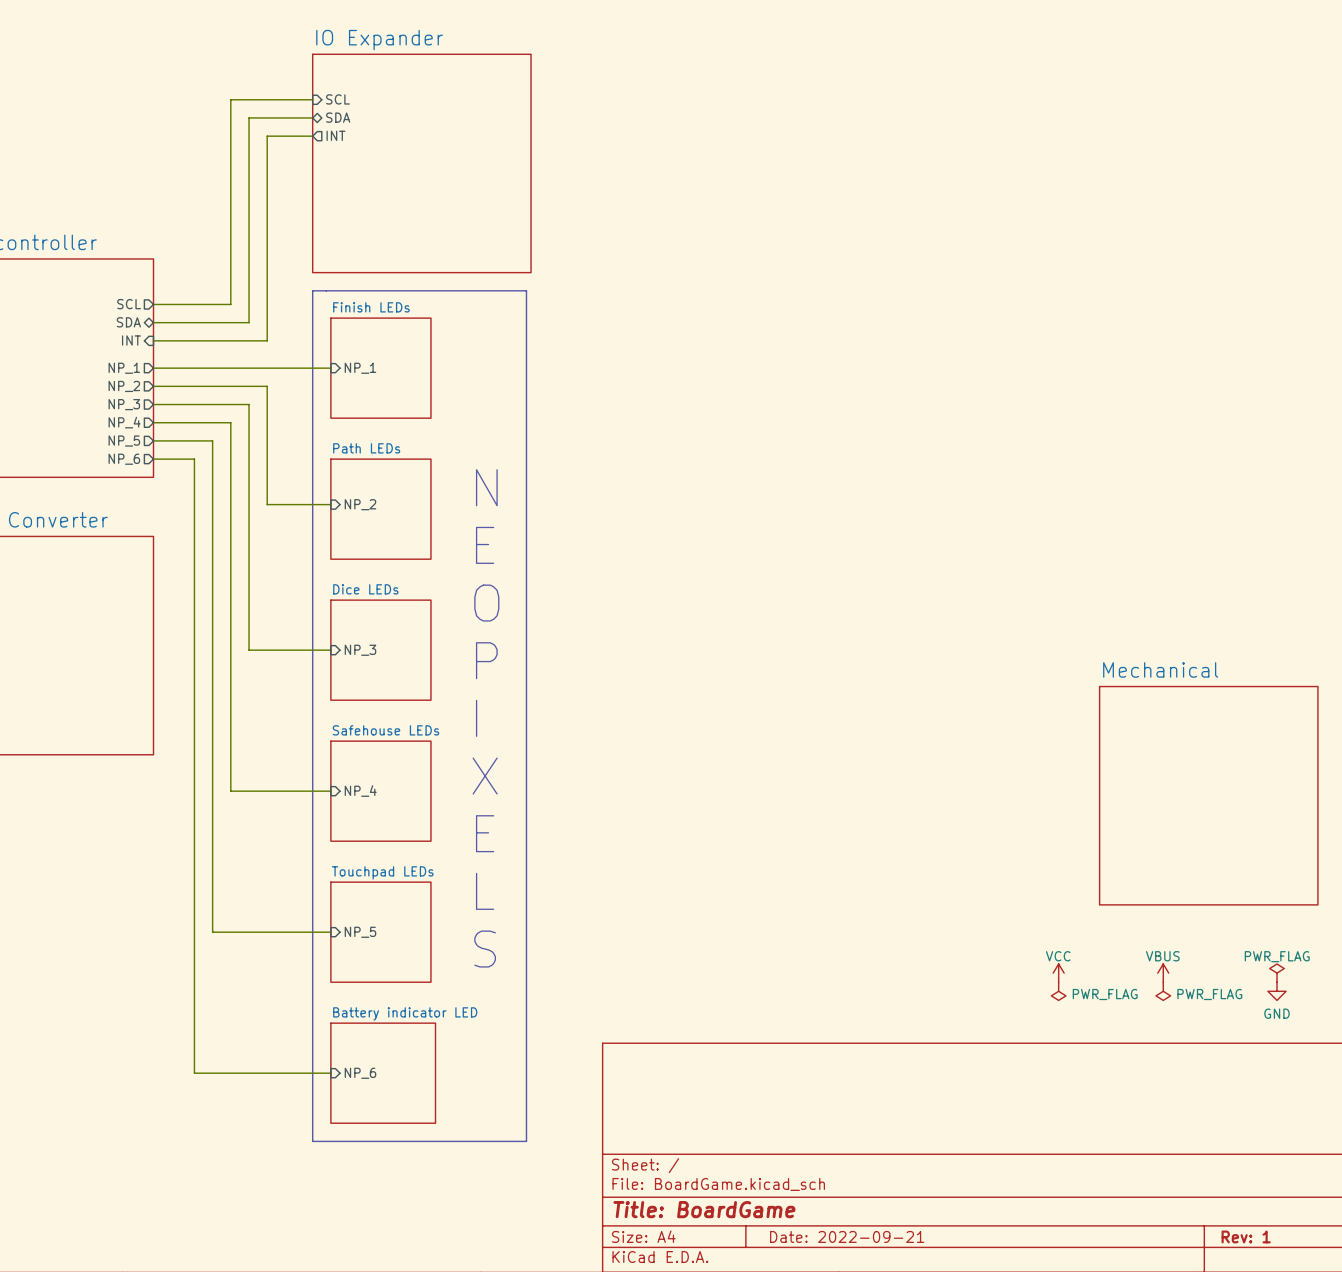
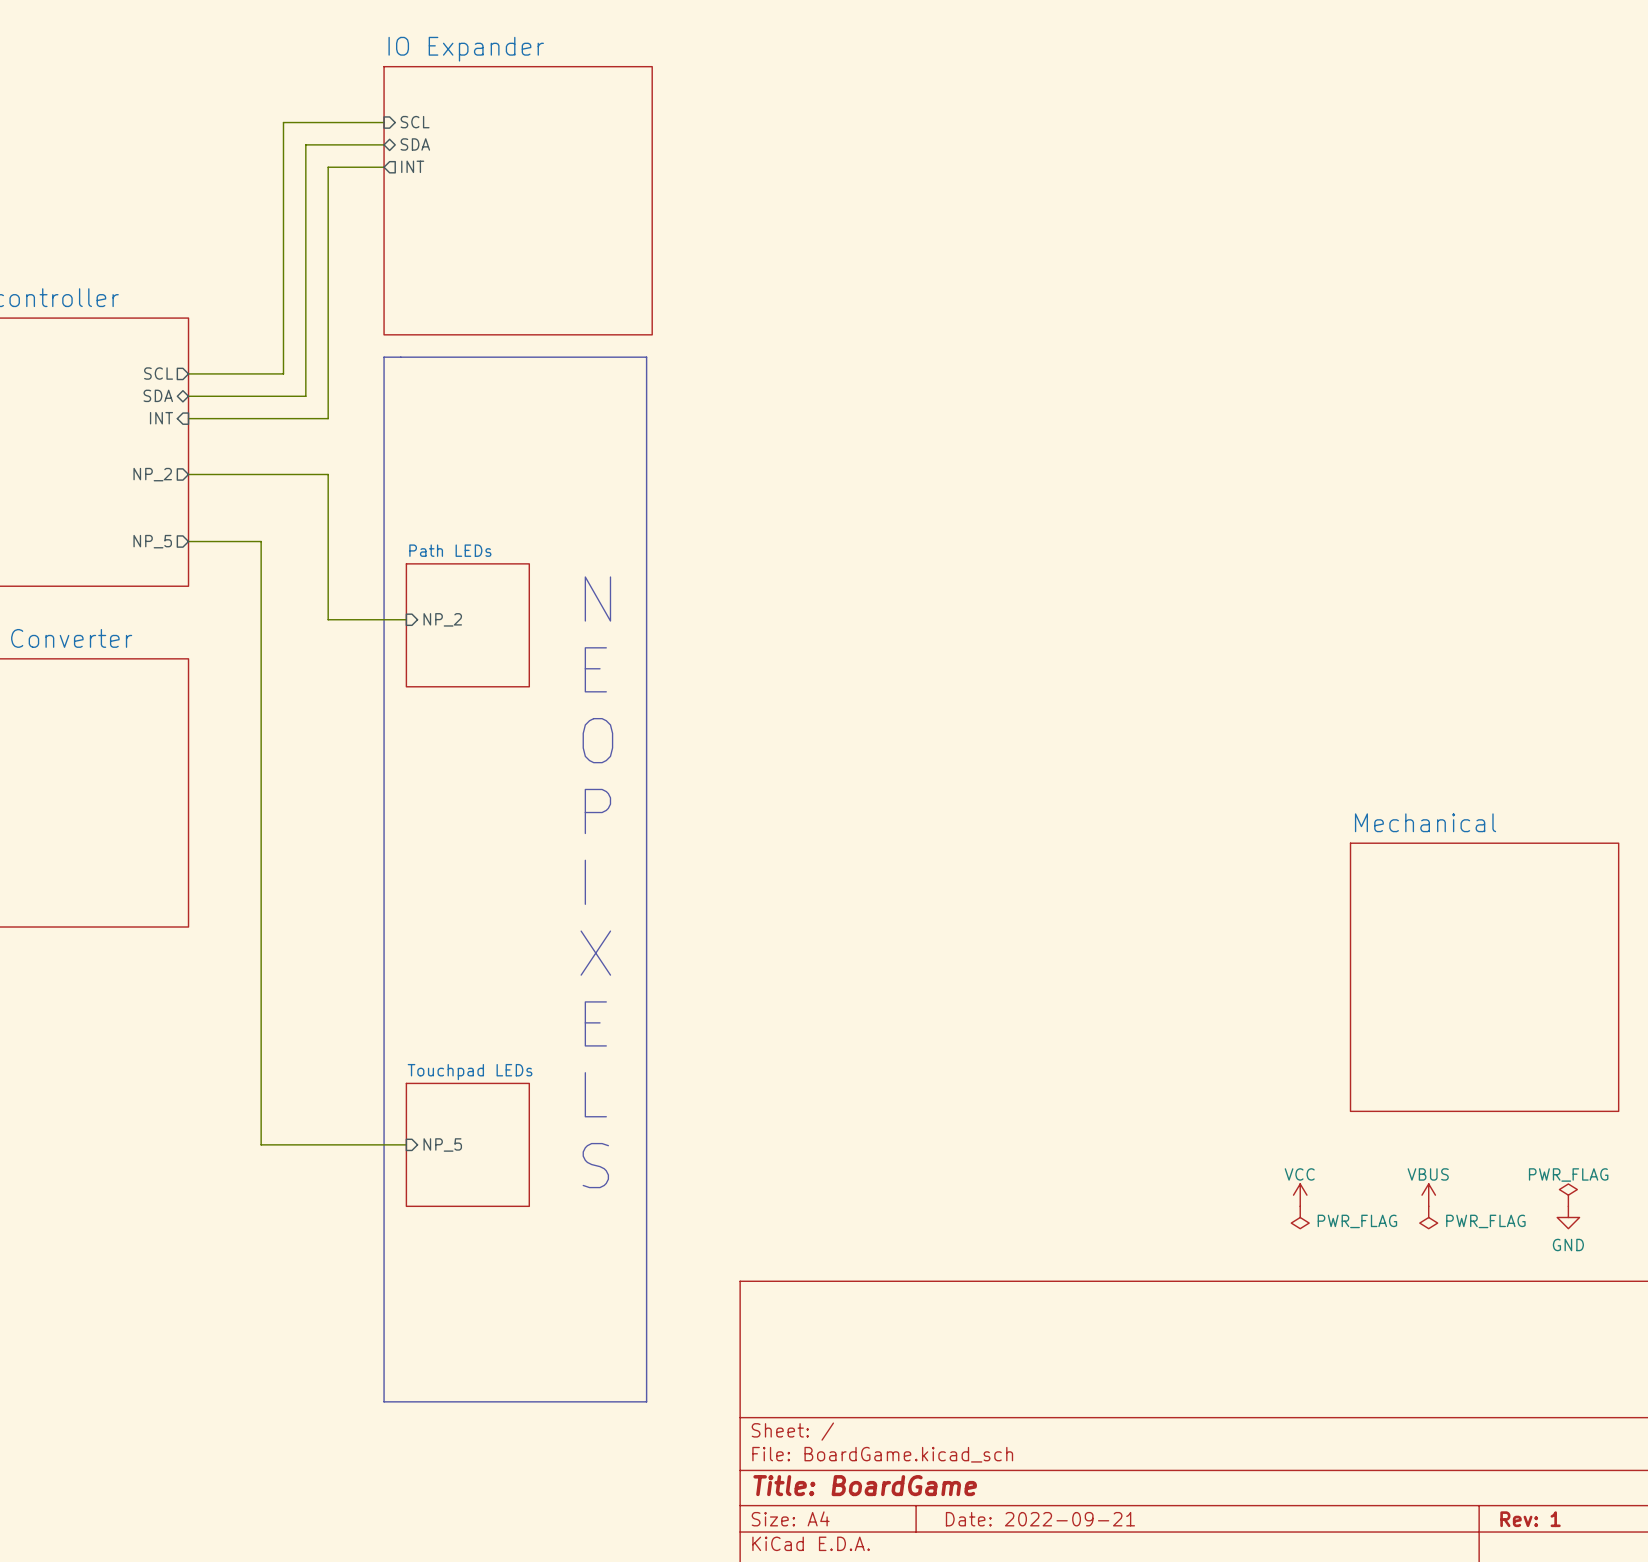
sheet pin: NP_1 (124, 368) -> none
wire: (153, 368) (330, 368) -> none
sheet pin: NP_1 (360, 368) -> none
sheet Finish LEDs: (380, 368) -> none
sheet pin: NP_3 (124, 404) -> none
wire: (153, 404) (249, 404) (249, 650) (330, 650) -> none
sheet pin: NP_4 (124, 422) -> none
wire: (153, 422) (230, 422) (230, 791) (330, 791) -> none
sheet pin: NP_6 (124, 459) -> none
wire: (153, 459) (194, 459) (194, 1073) (330, 1073) -> none
sheet pin: NP_3 (360, 650) -> none
sheet Dice LEDs: (380, 650) -> none
sheet pin: NP_4 (360, 791) -> none
sheet Safehouse LEDs: (380, 791) -> none
sheet pin: NP_6 (360, 1073) -> none
sheet Battery indicator LED: (383, 1073) -> none

